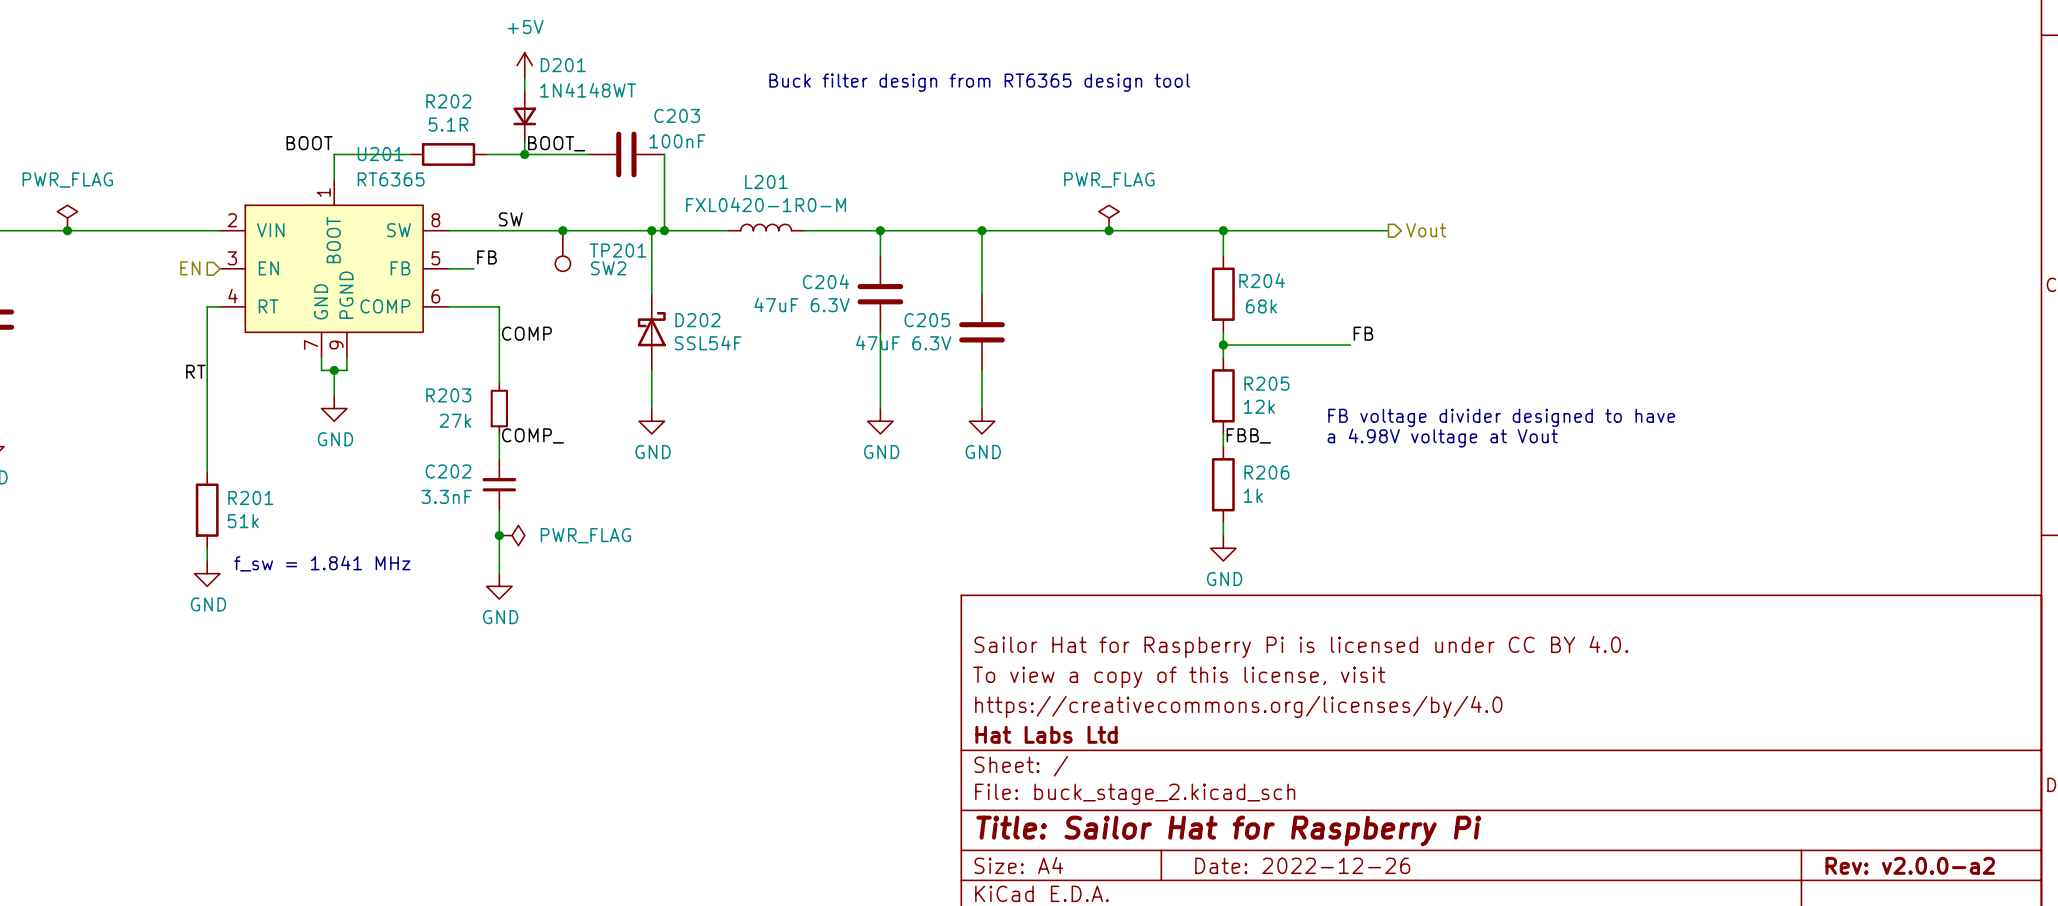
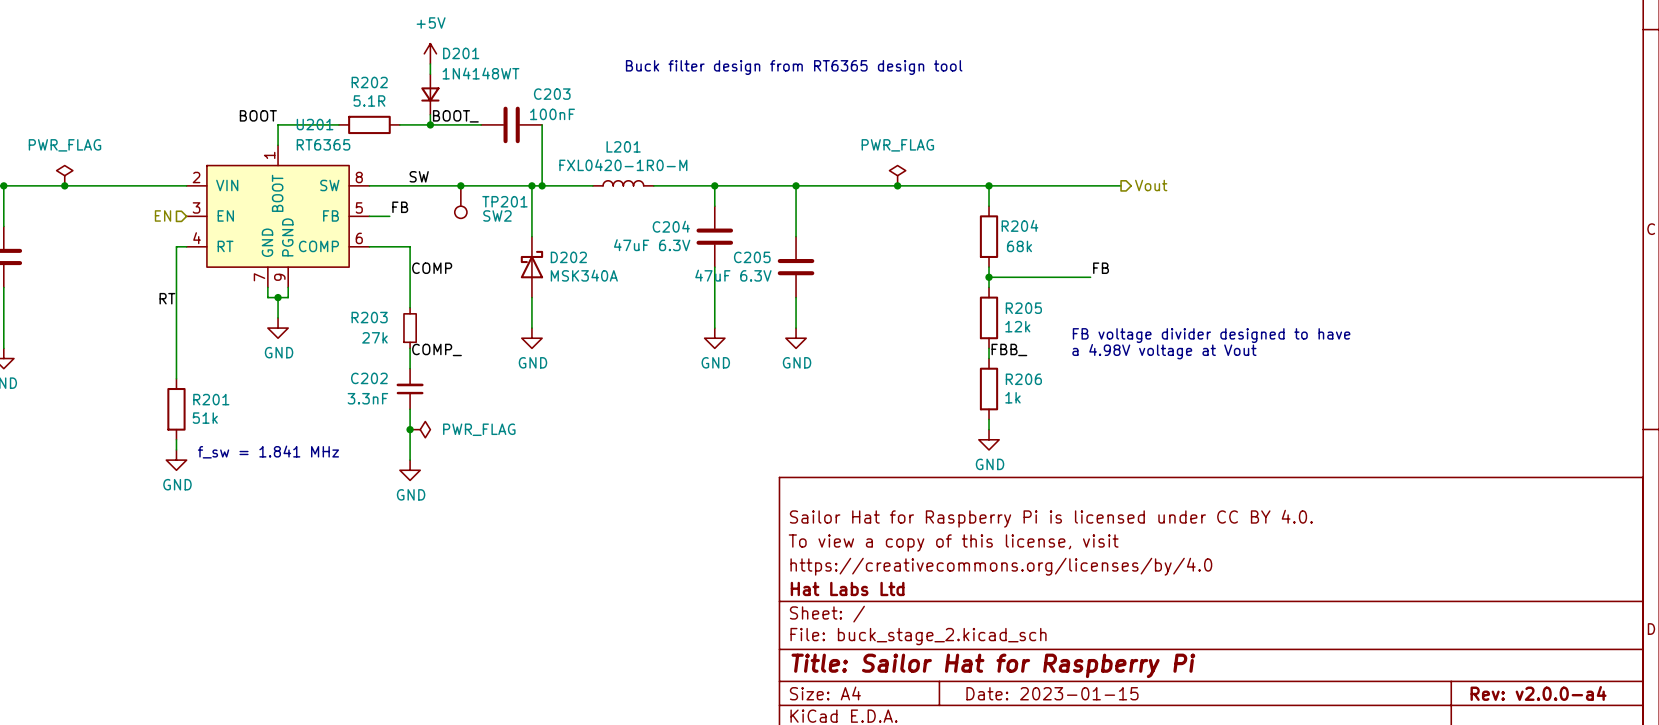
D202 value: SSL54F (708, 342) -> MSK340A (584, 275)
title block: Date: 2022-12-26 (1302, 865) -> Date: 2023-01-15 (1052, 693)
title block: Rev: v2.0.0-a2 (1910, 865) -> Rev: v2.0.0-a4 (1538, 693)

